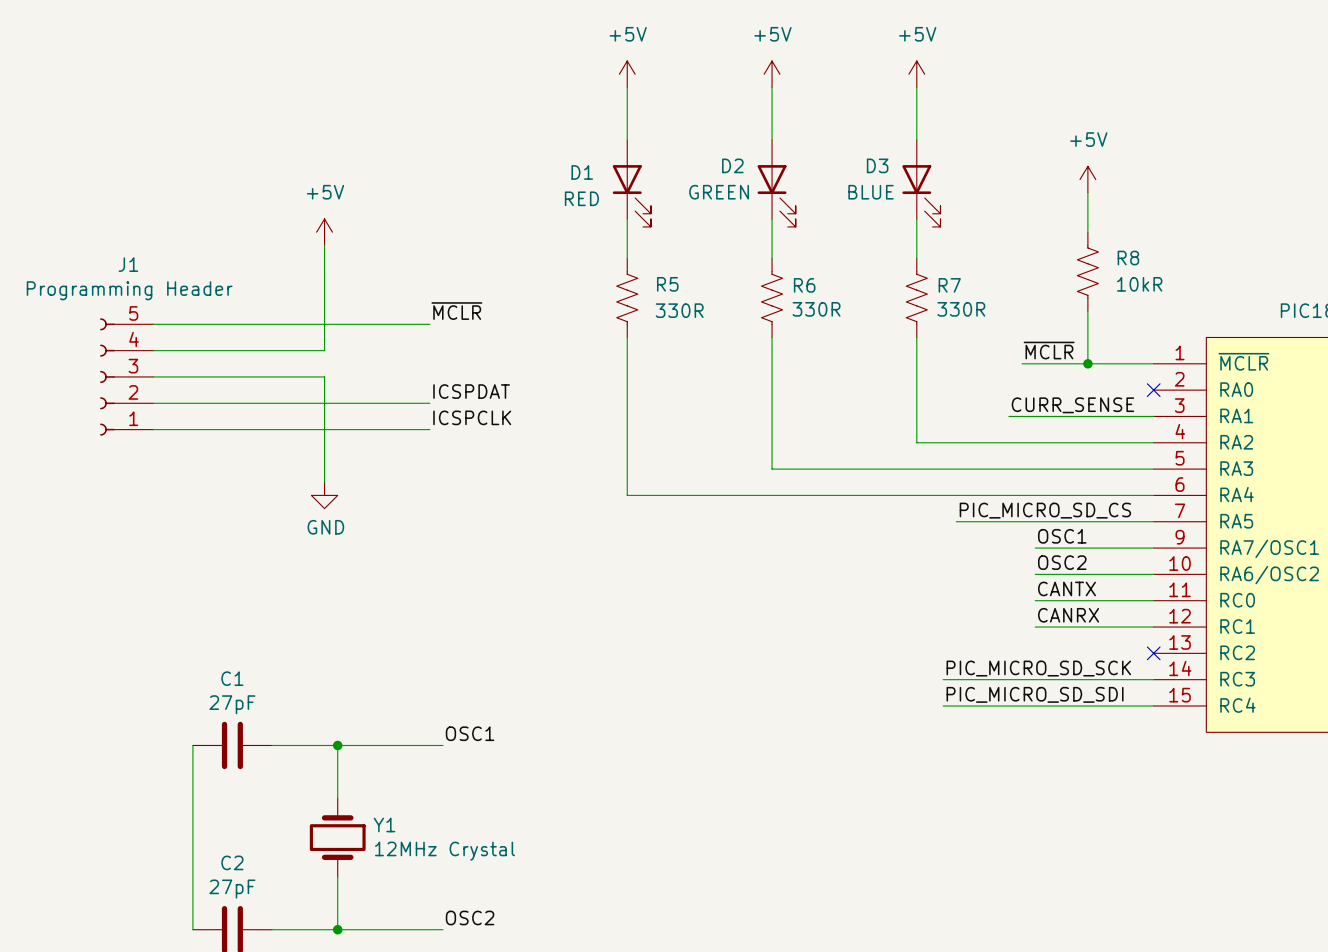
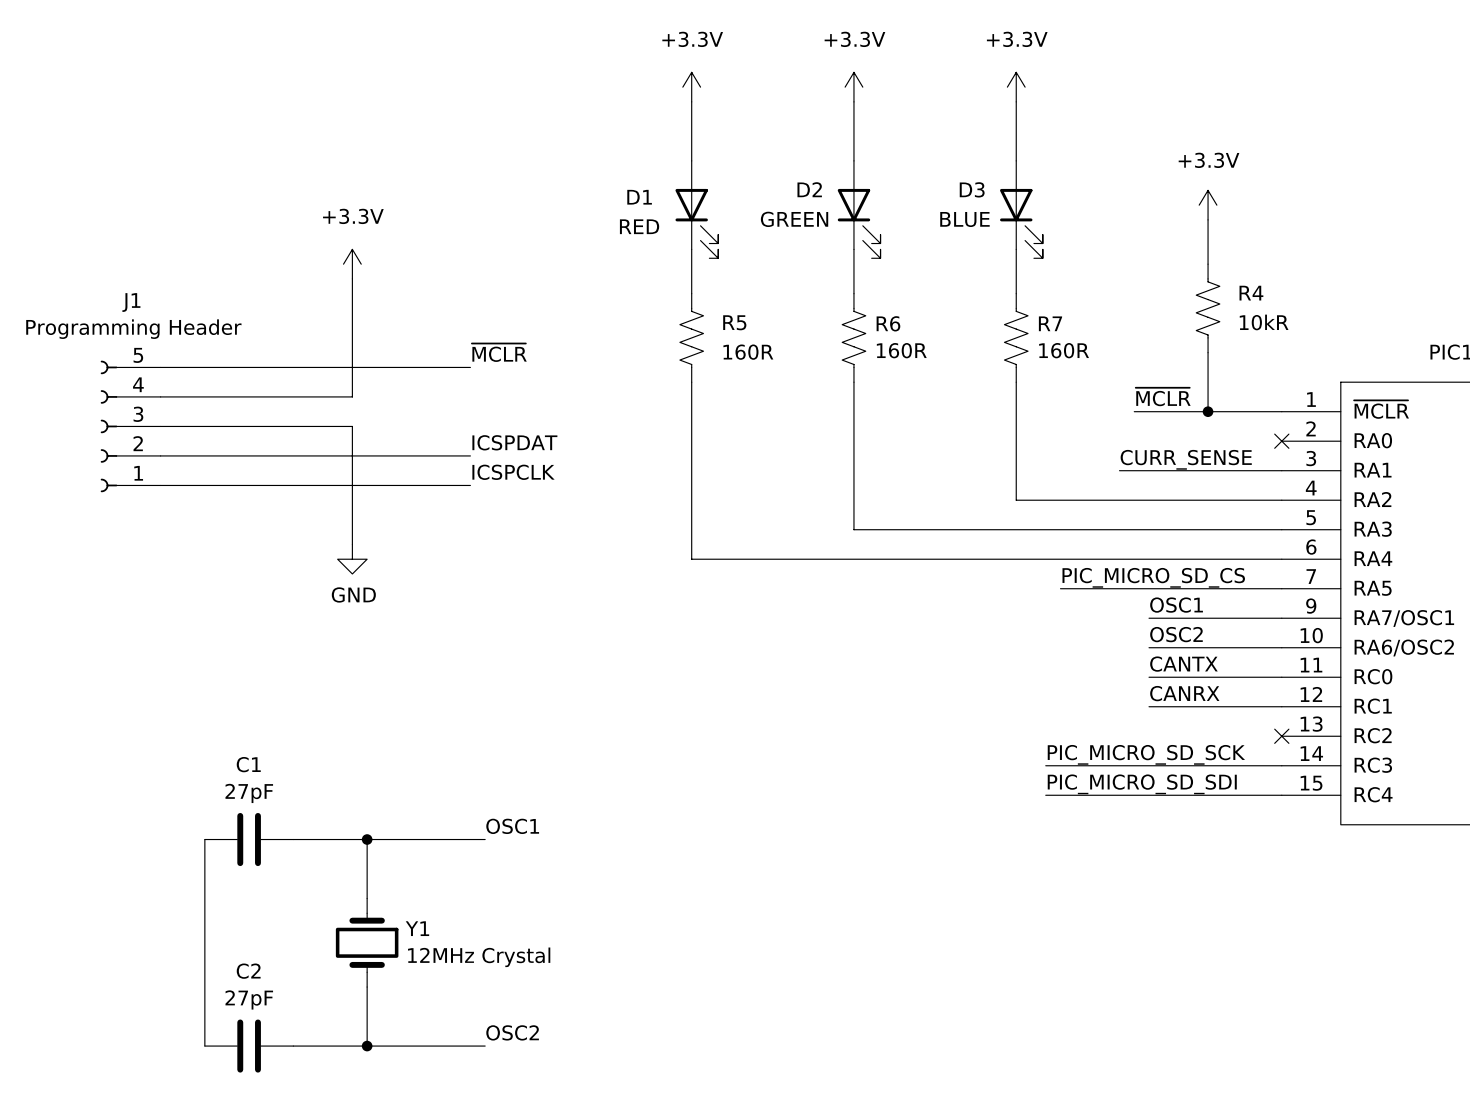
power symbol: +5V (627, 74) -> +3.3V (691, 87)
power symbol: +5V (772, 74) -> +3.3V (853, 87)
power symbol: +5V (916, 74) -> +3.3V (1016, 87)
power symbol: +5V (1087, 179) -> +3.3V (1208, 205)
power symbol: +5V (324, 232) -> +3.3V (352, 264)
R8 name: R8 (1128, 258) -> R4 (1251, 293)
R6 value: 330R (816, 309) -> 160R (901, 350)
R7 value: 330R (961, 309) -> 160R (1064, 350)
R5 value: 330R (679, 310) -> 160R (748, 352)

